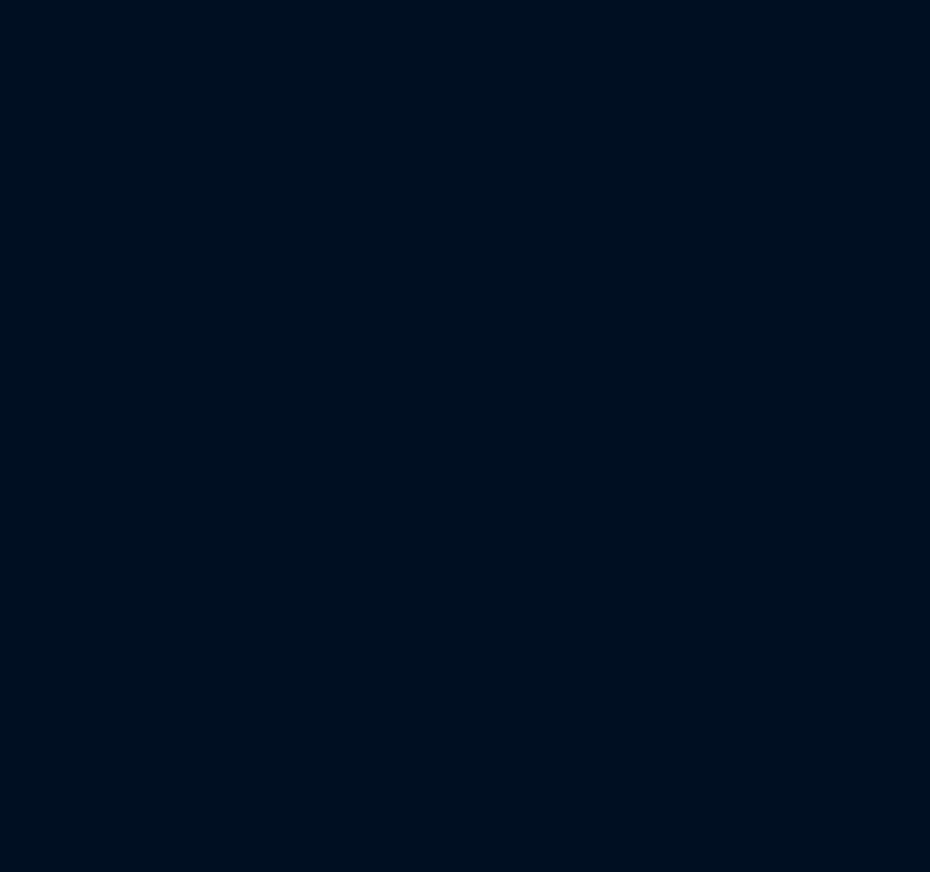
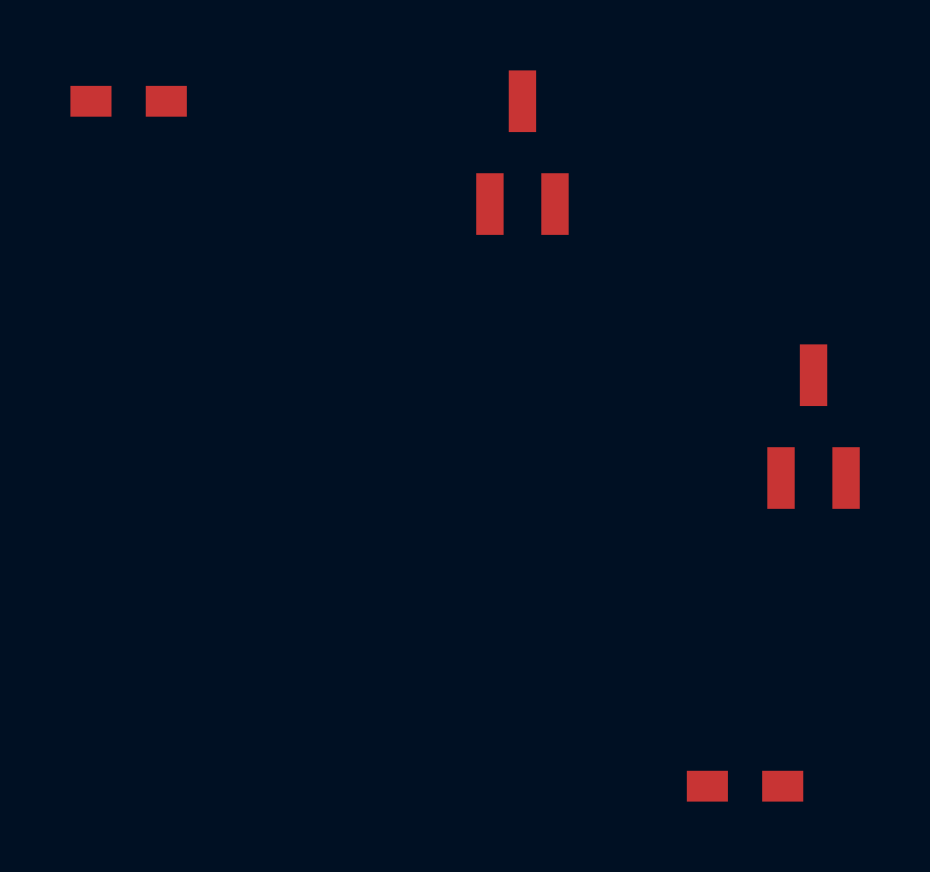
part: none -> (128, 101)
part: none -> (522, 152)
part: none -> (813, 426)
part: none -> (745, 786)

